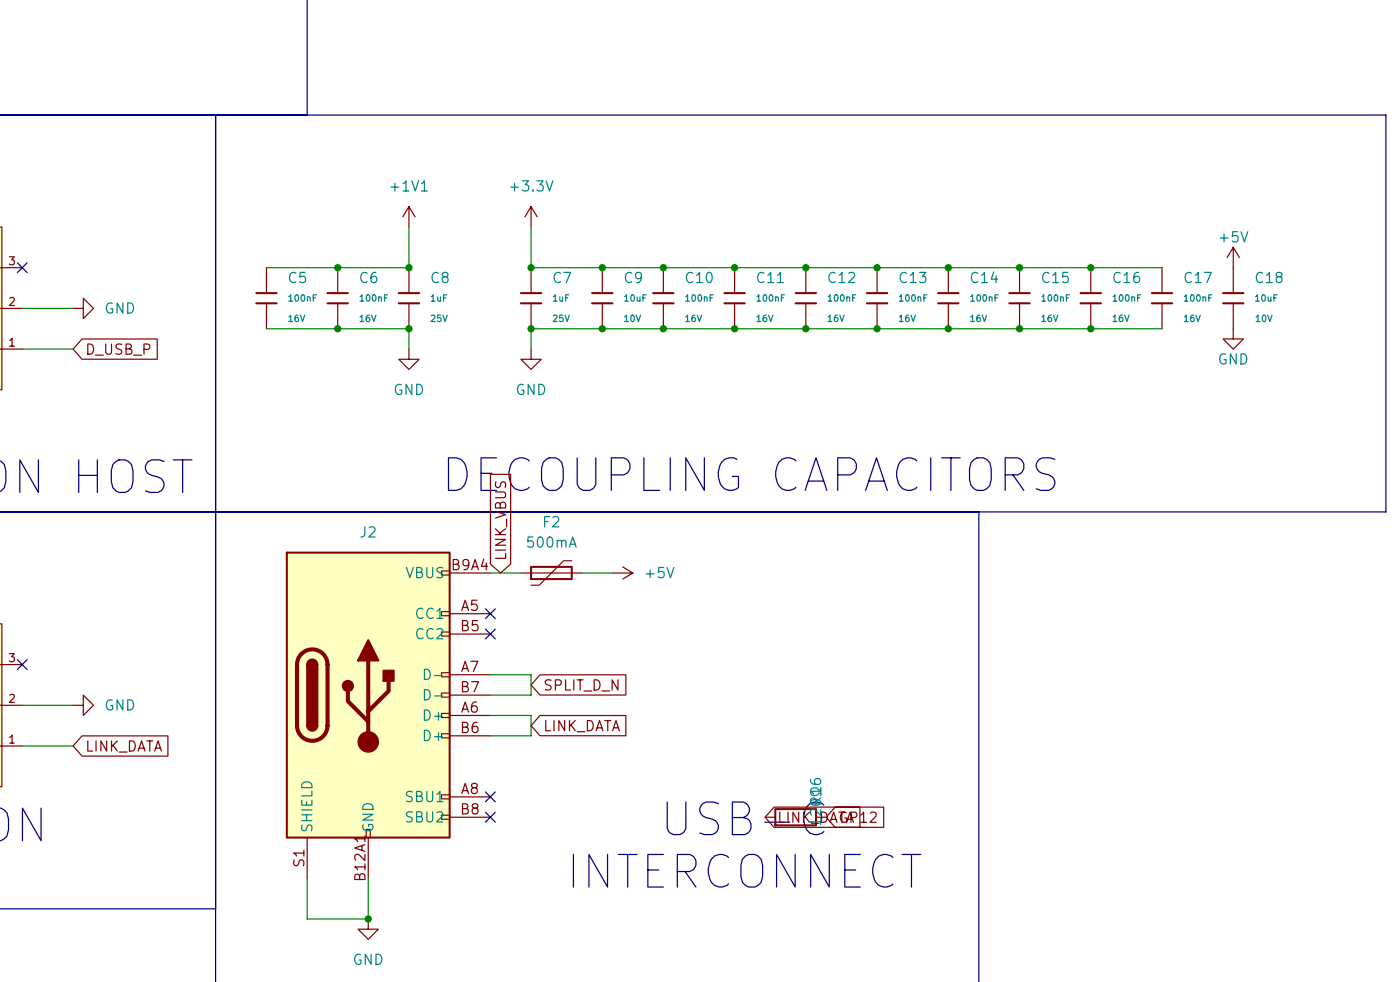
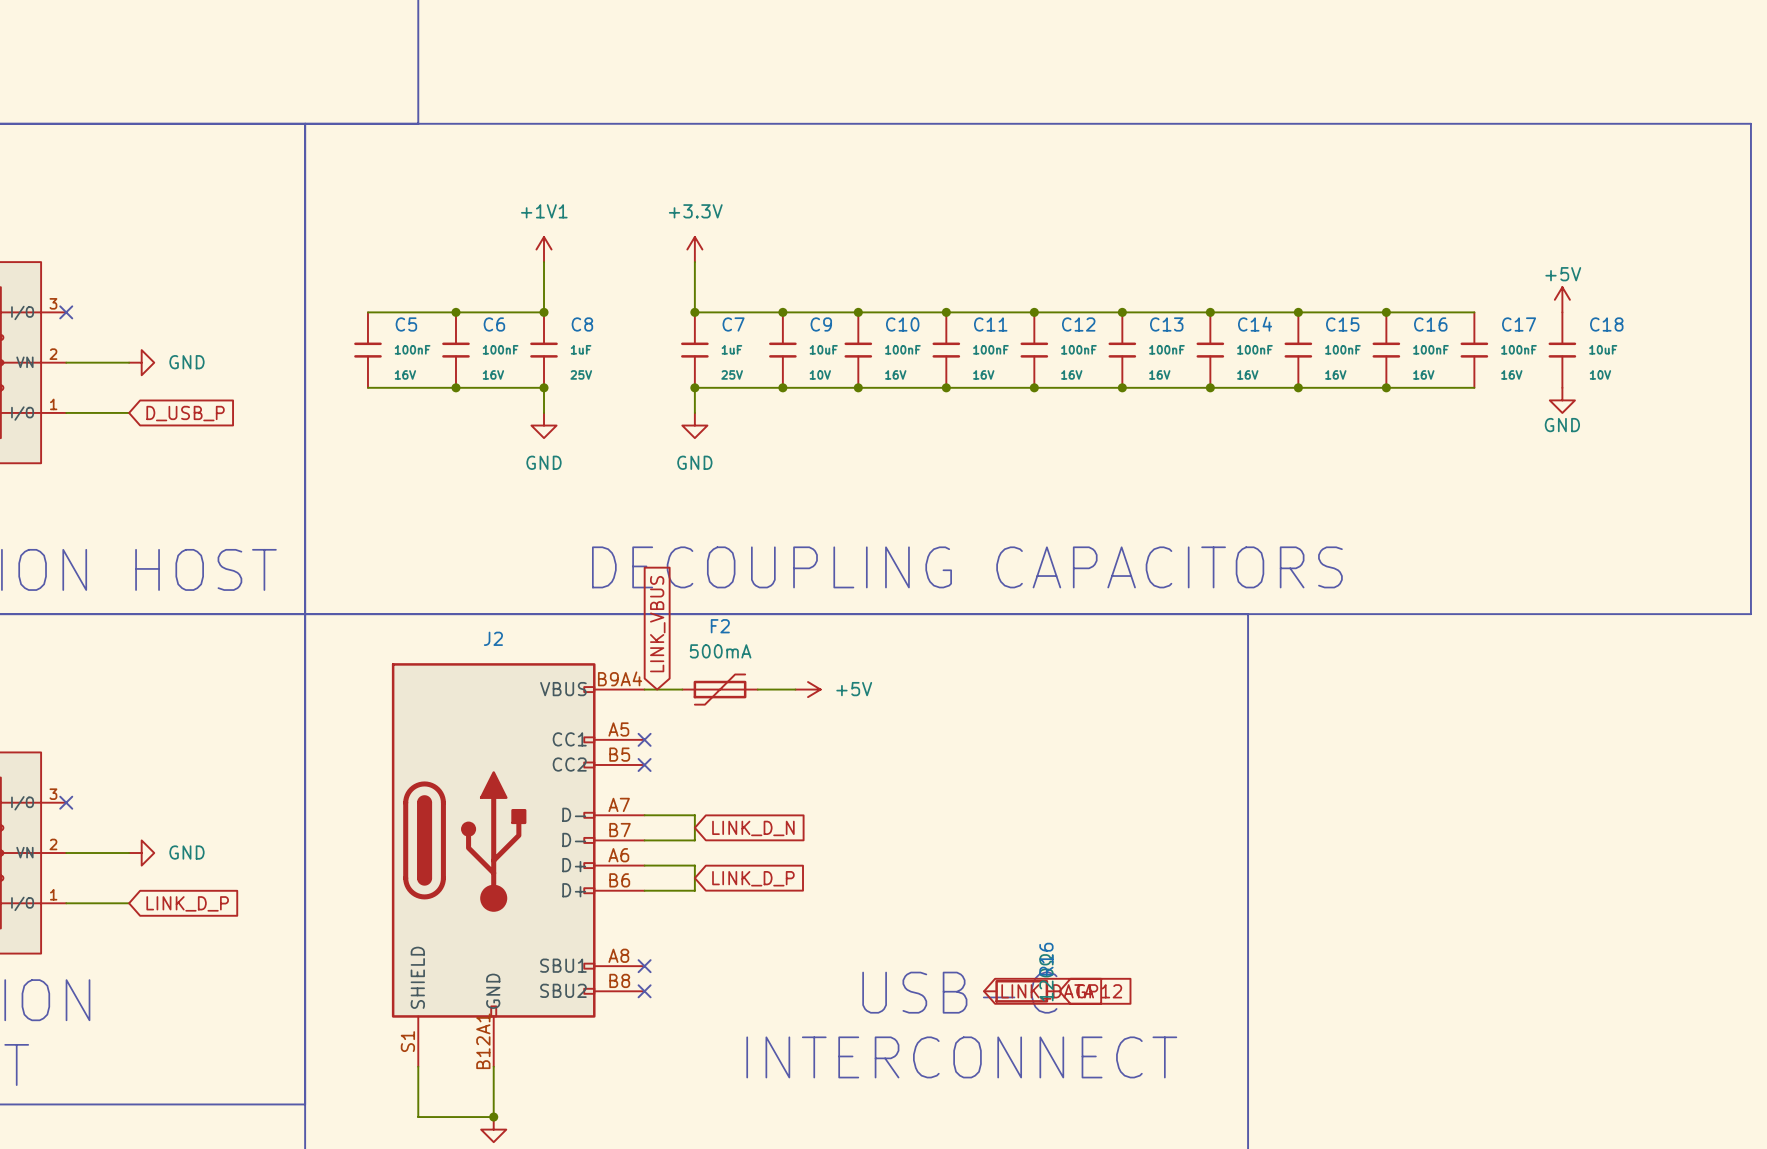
global label: SPLIT_D_N (581, 685) -> LINK_D_N (753, 828)
global label: LINK_DATA (582, 726) -> LINK_D_P (753, 878)
global label: LINK_DATA (124, 746) -> LINK_D_P (187, 903)

